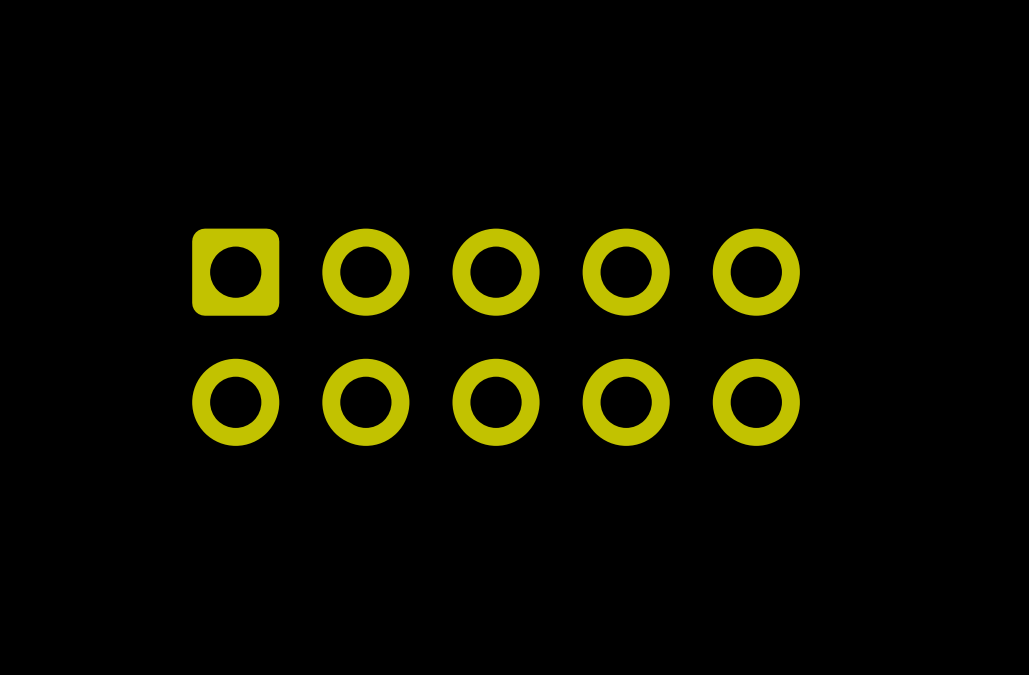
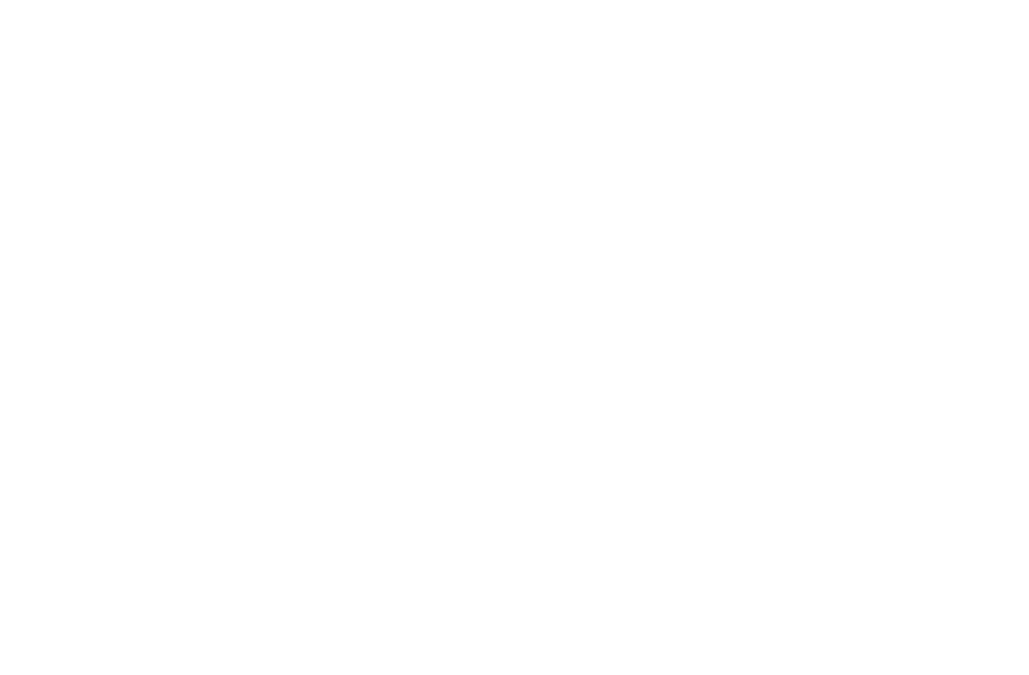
part: (496, 337) -> none

